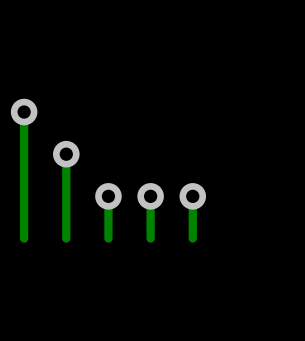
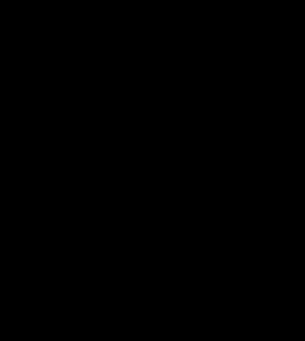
track: (24, 112) (24, 238) -> none
via: (24, 112) -> none
track: (66, 154) (66, 238) -> none
via: (66, 154) -> none
track: (108, 196) (108, 238) -> none
via: (108, 196) -> none
track: (150, 196) (150, 238) -> none
via: (150, 196) -> none
track: (192, 196) (192, 238) -> none
via: (192, 196) -> none

